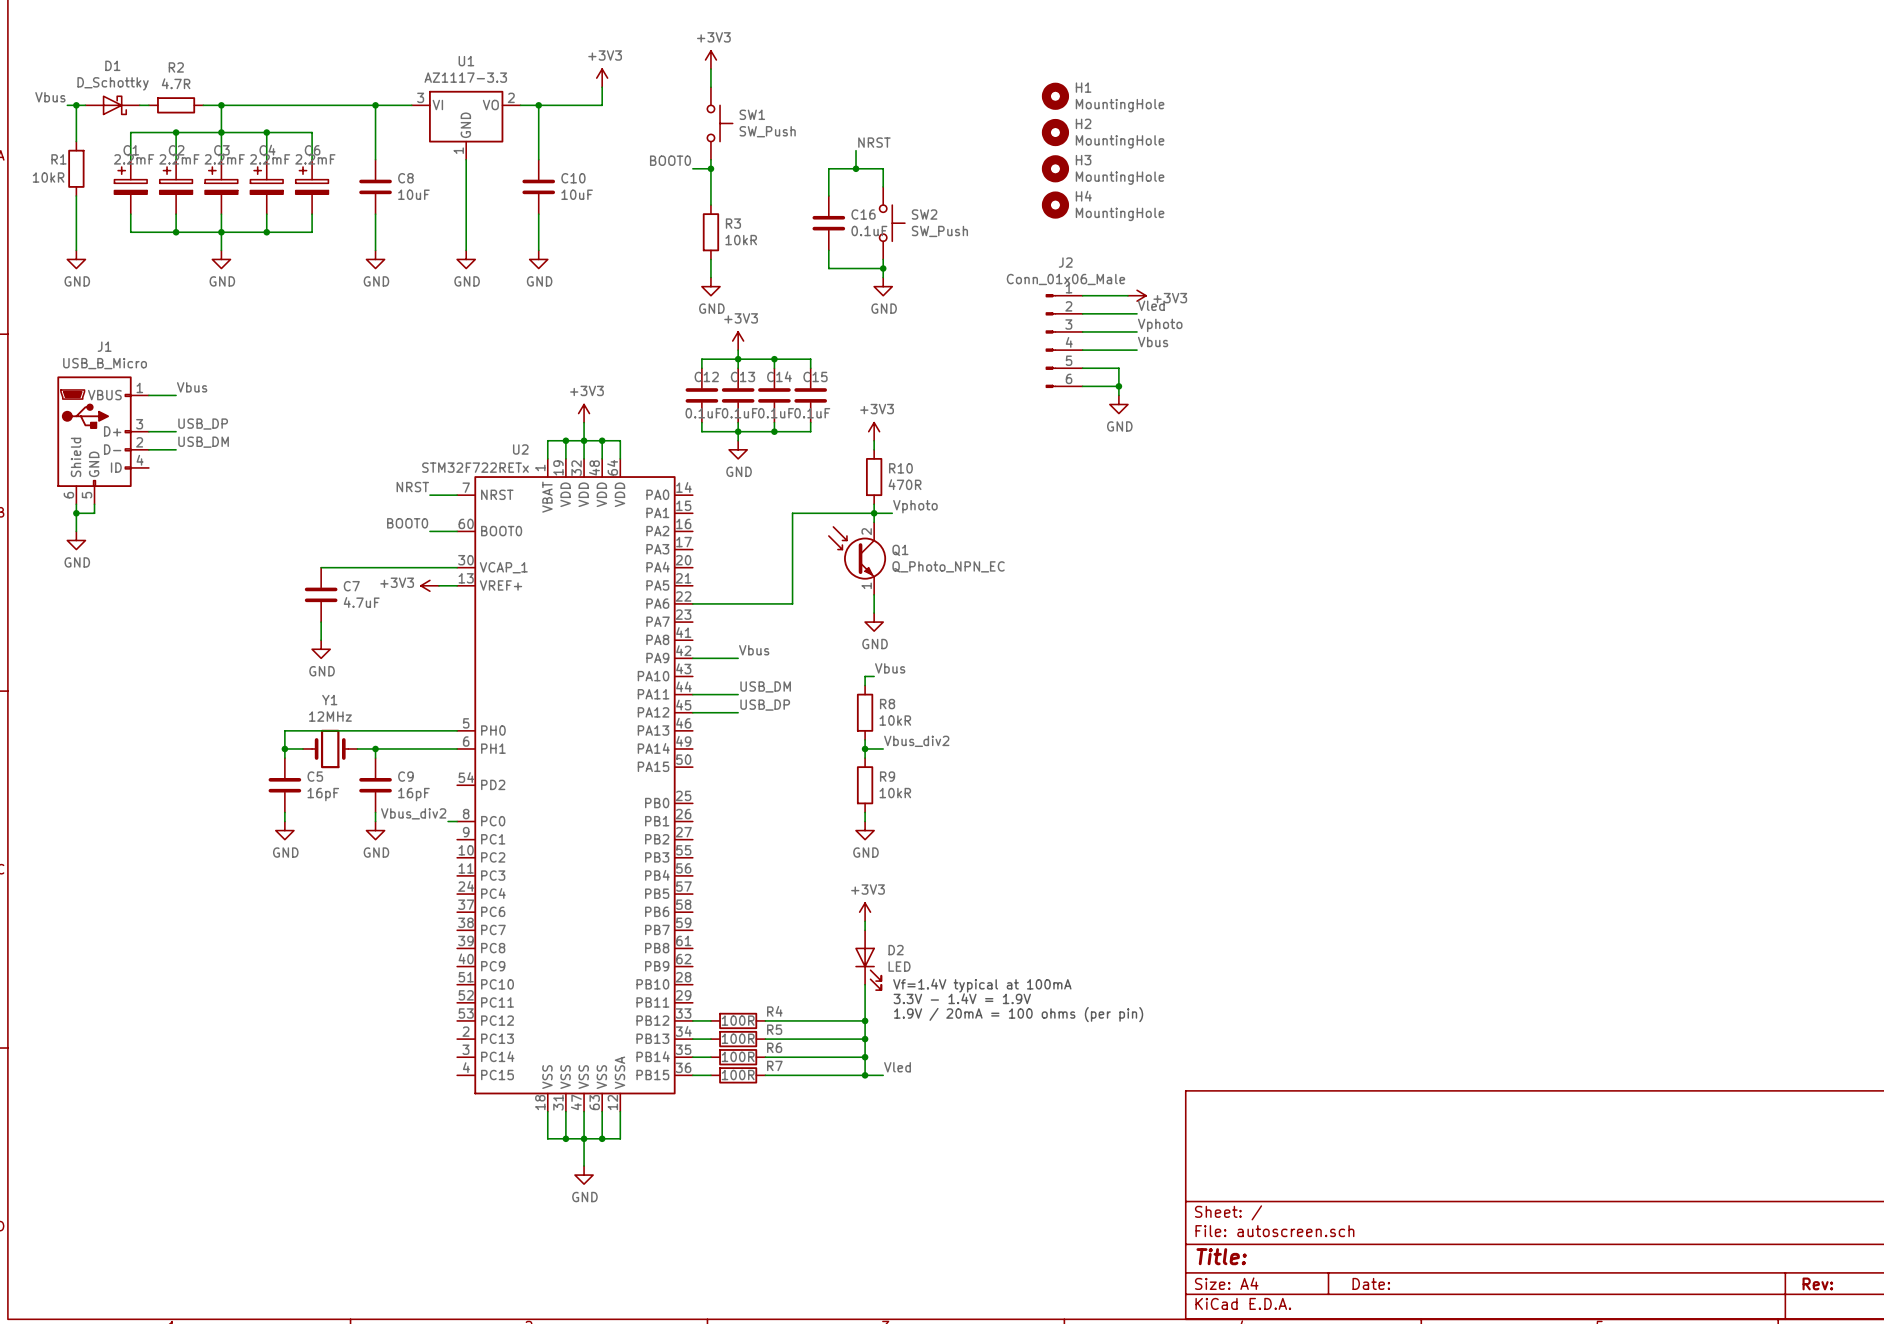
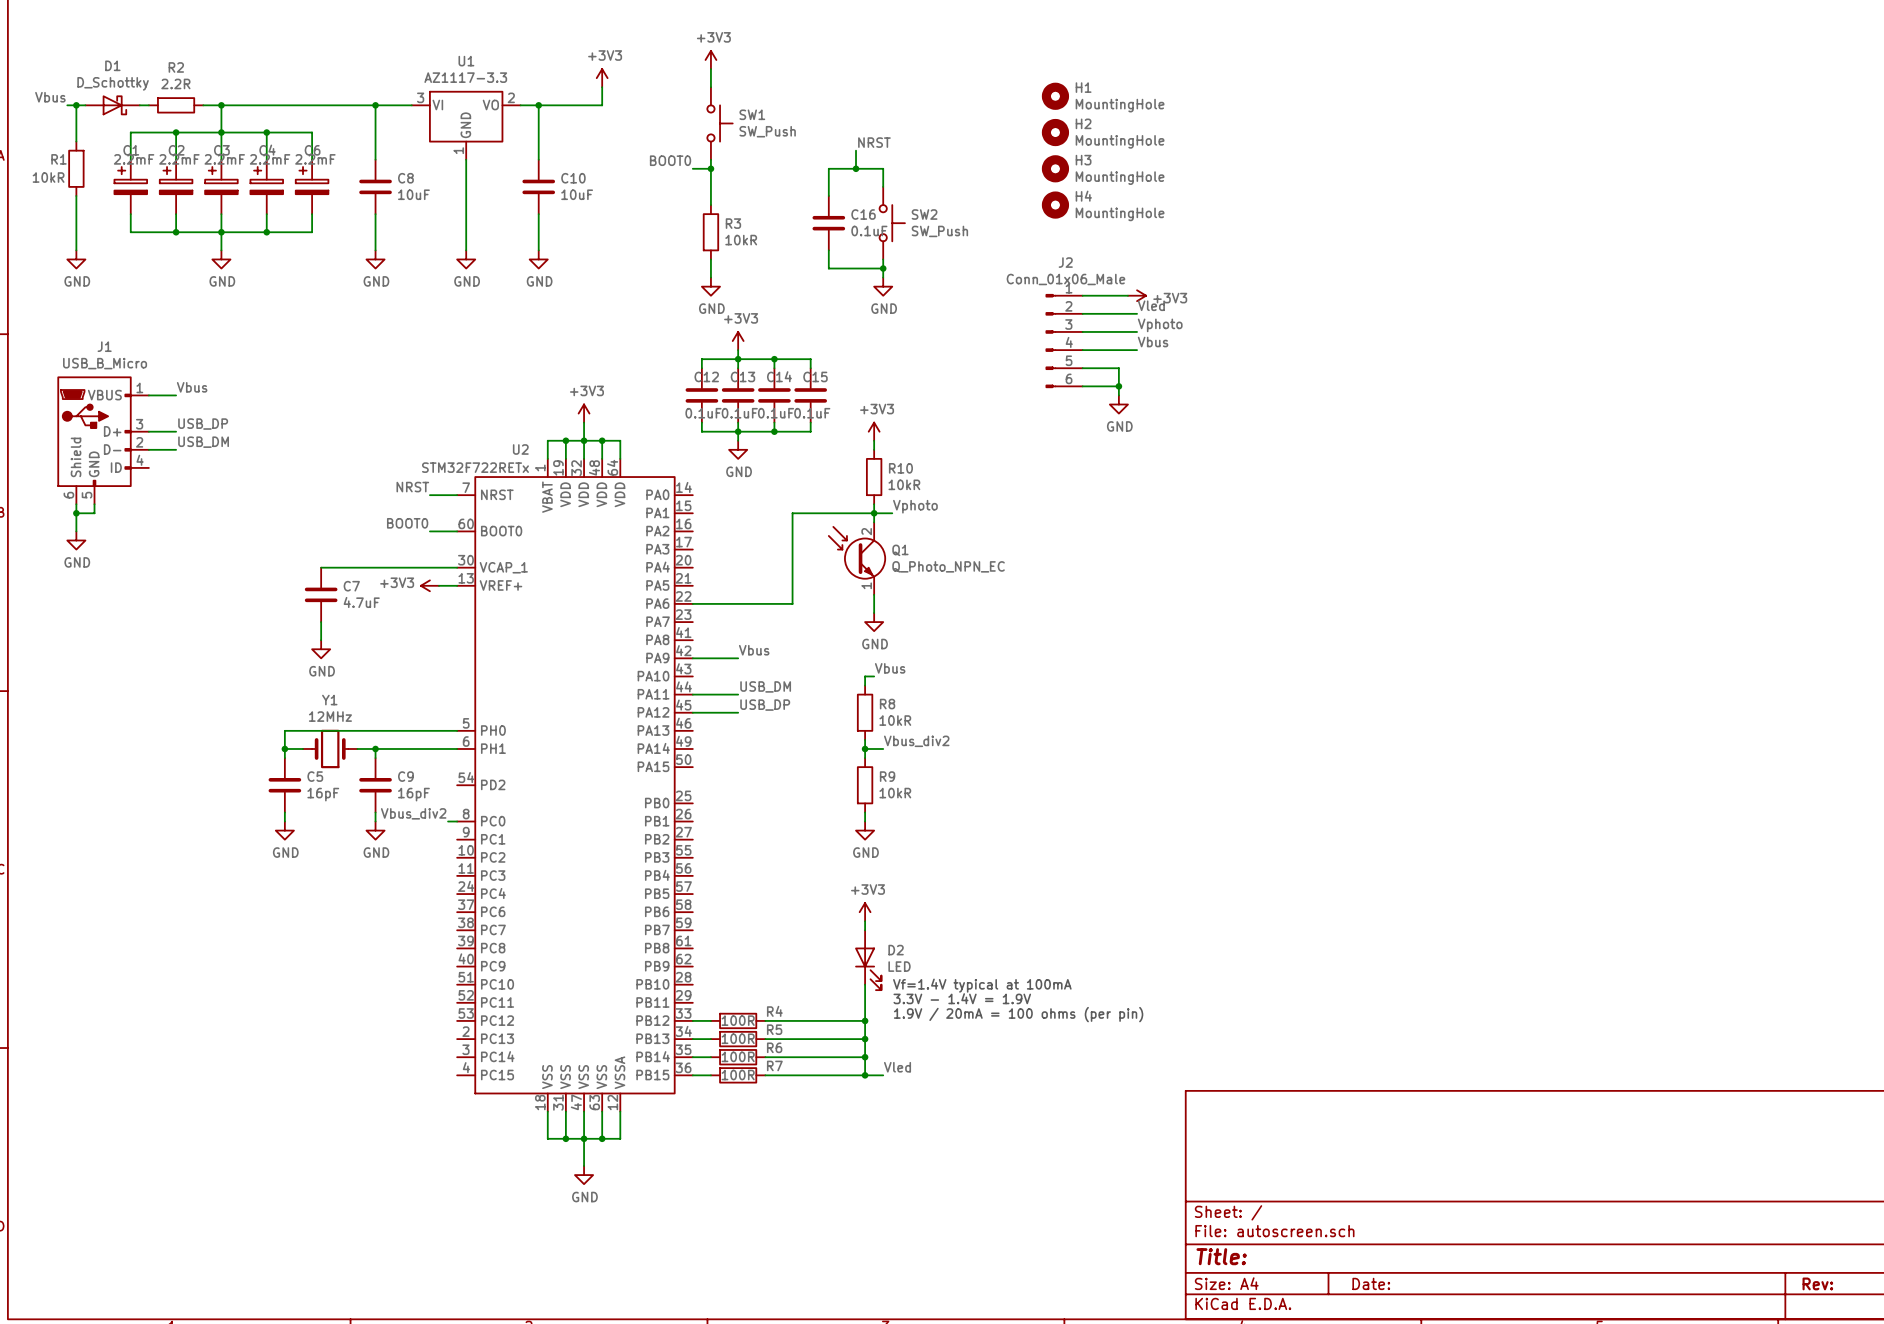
R2 value: 4.7R (176, 83) -> 2.2R (175, 83)
R10 value: 470R (905, 484) -> 10kR (904, 484)

